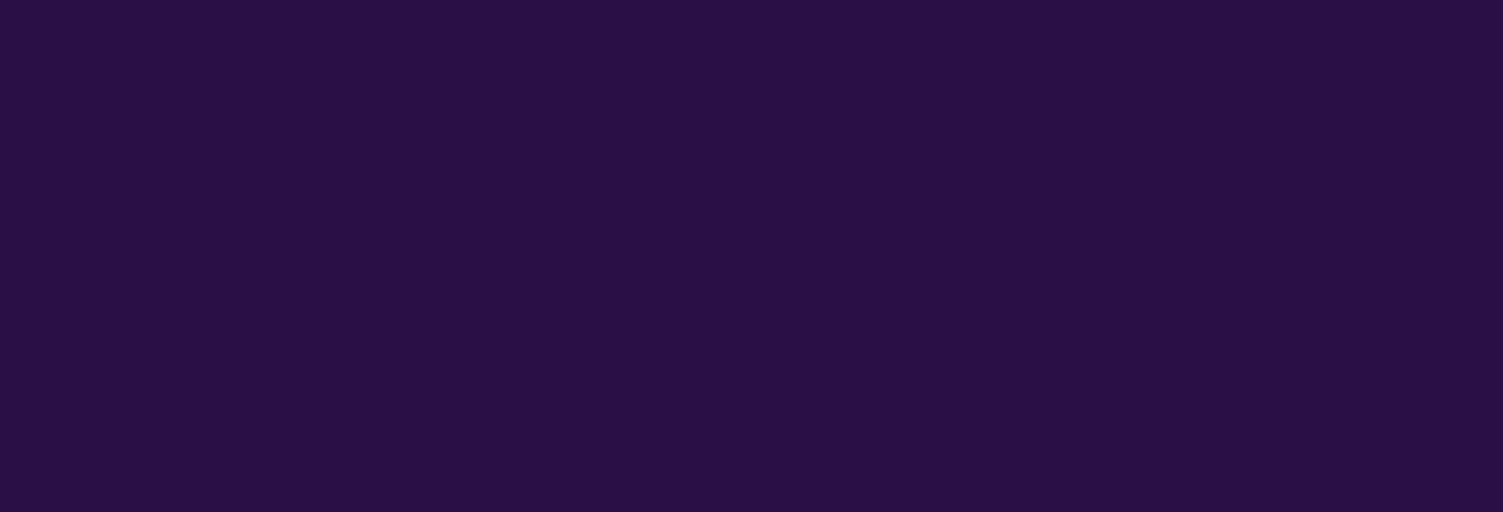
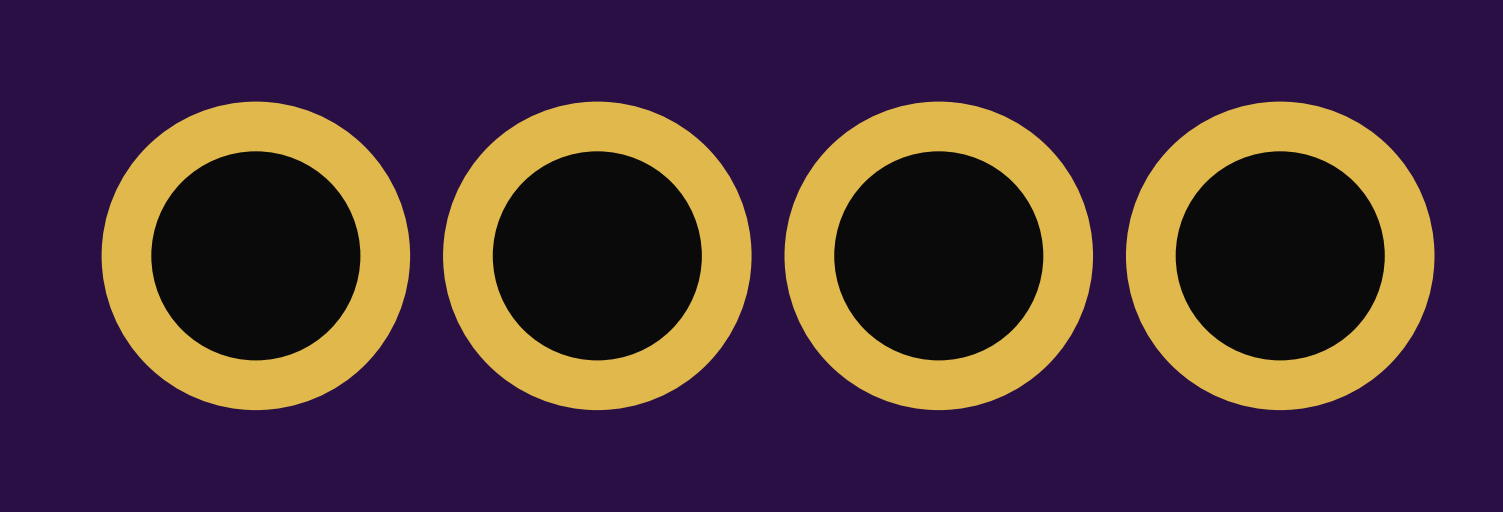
part: none -> (255, 255)
part: none -> (597, 255)
part: none -> (938, 255)
part: none -> (1280, 255)

